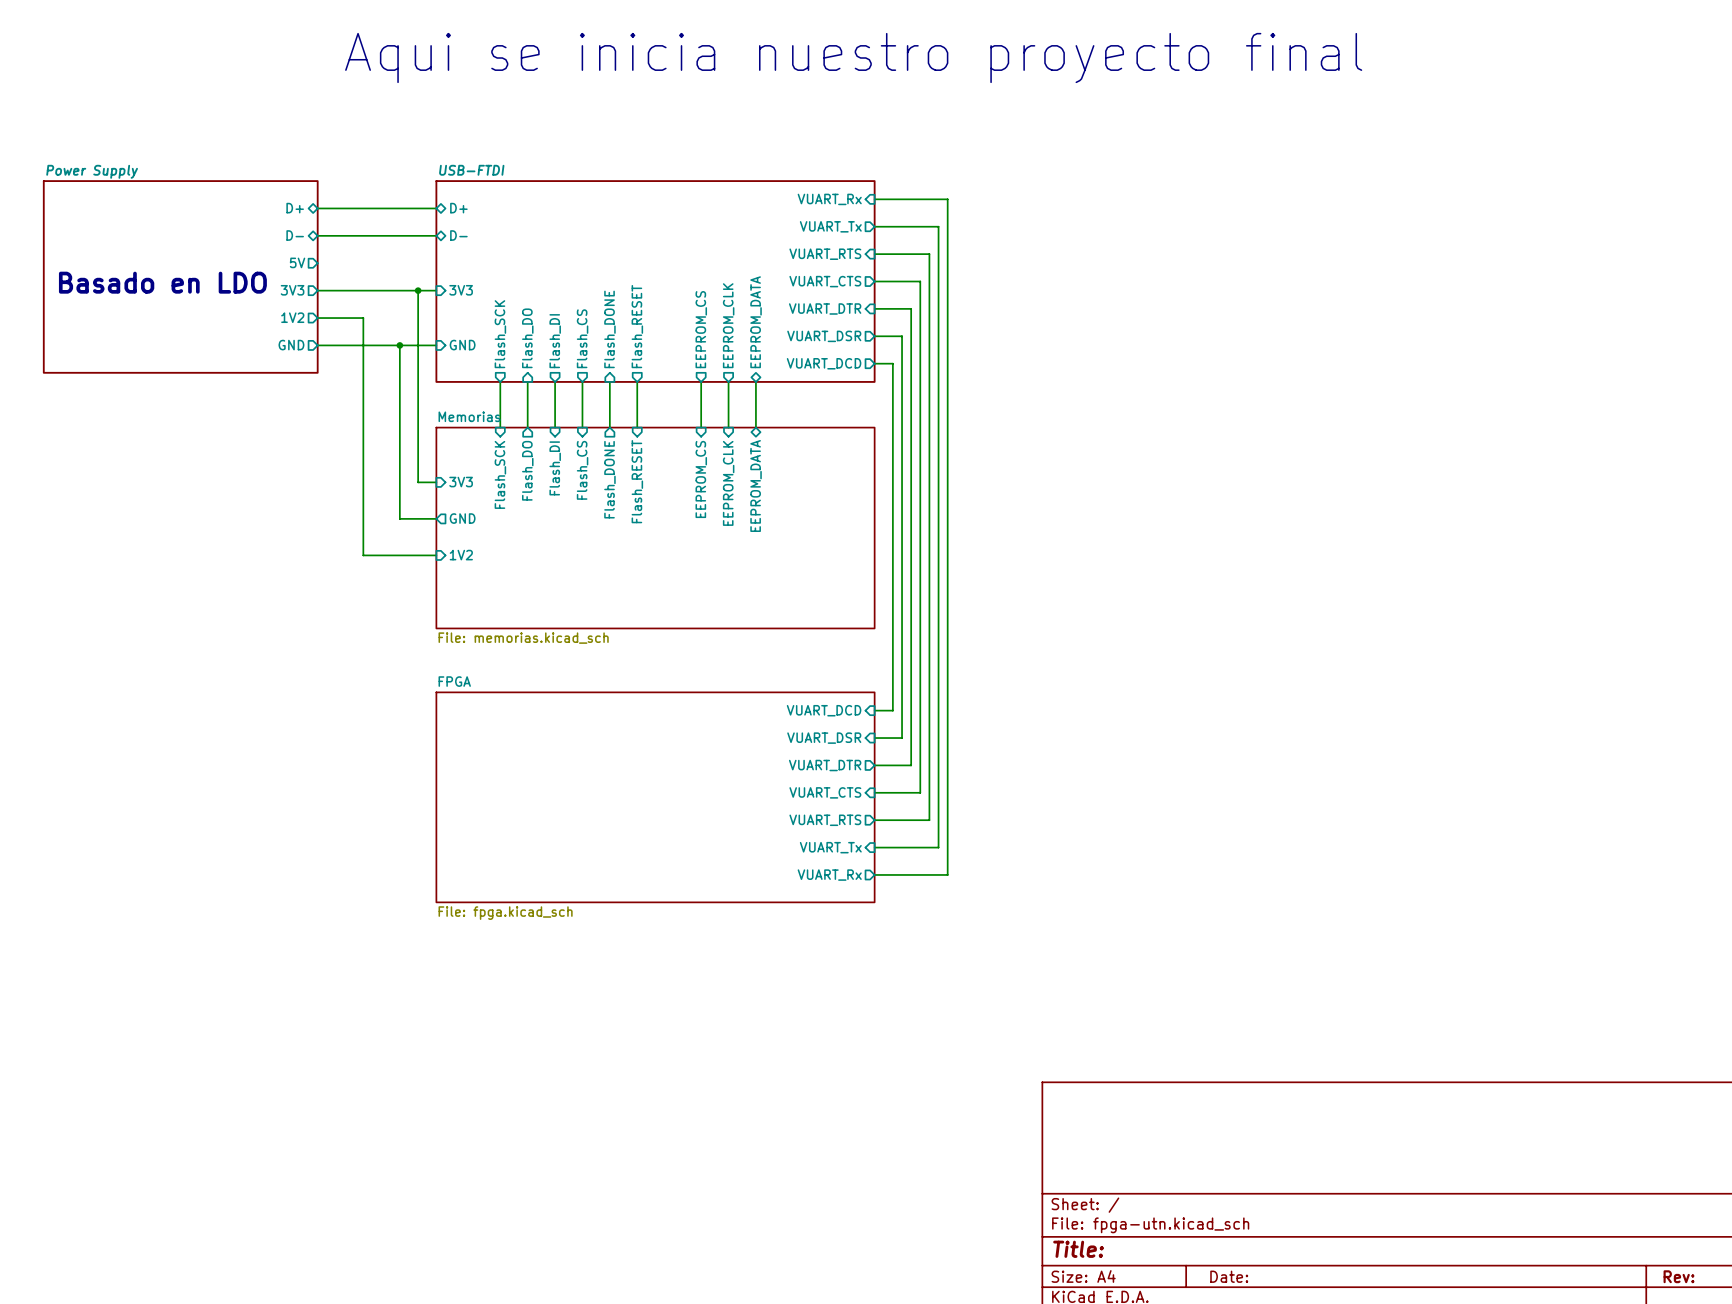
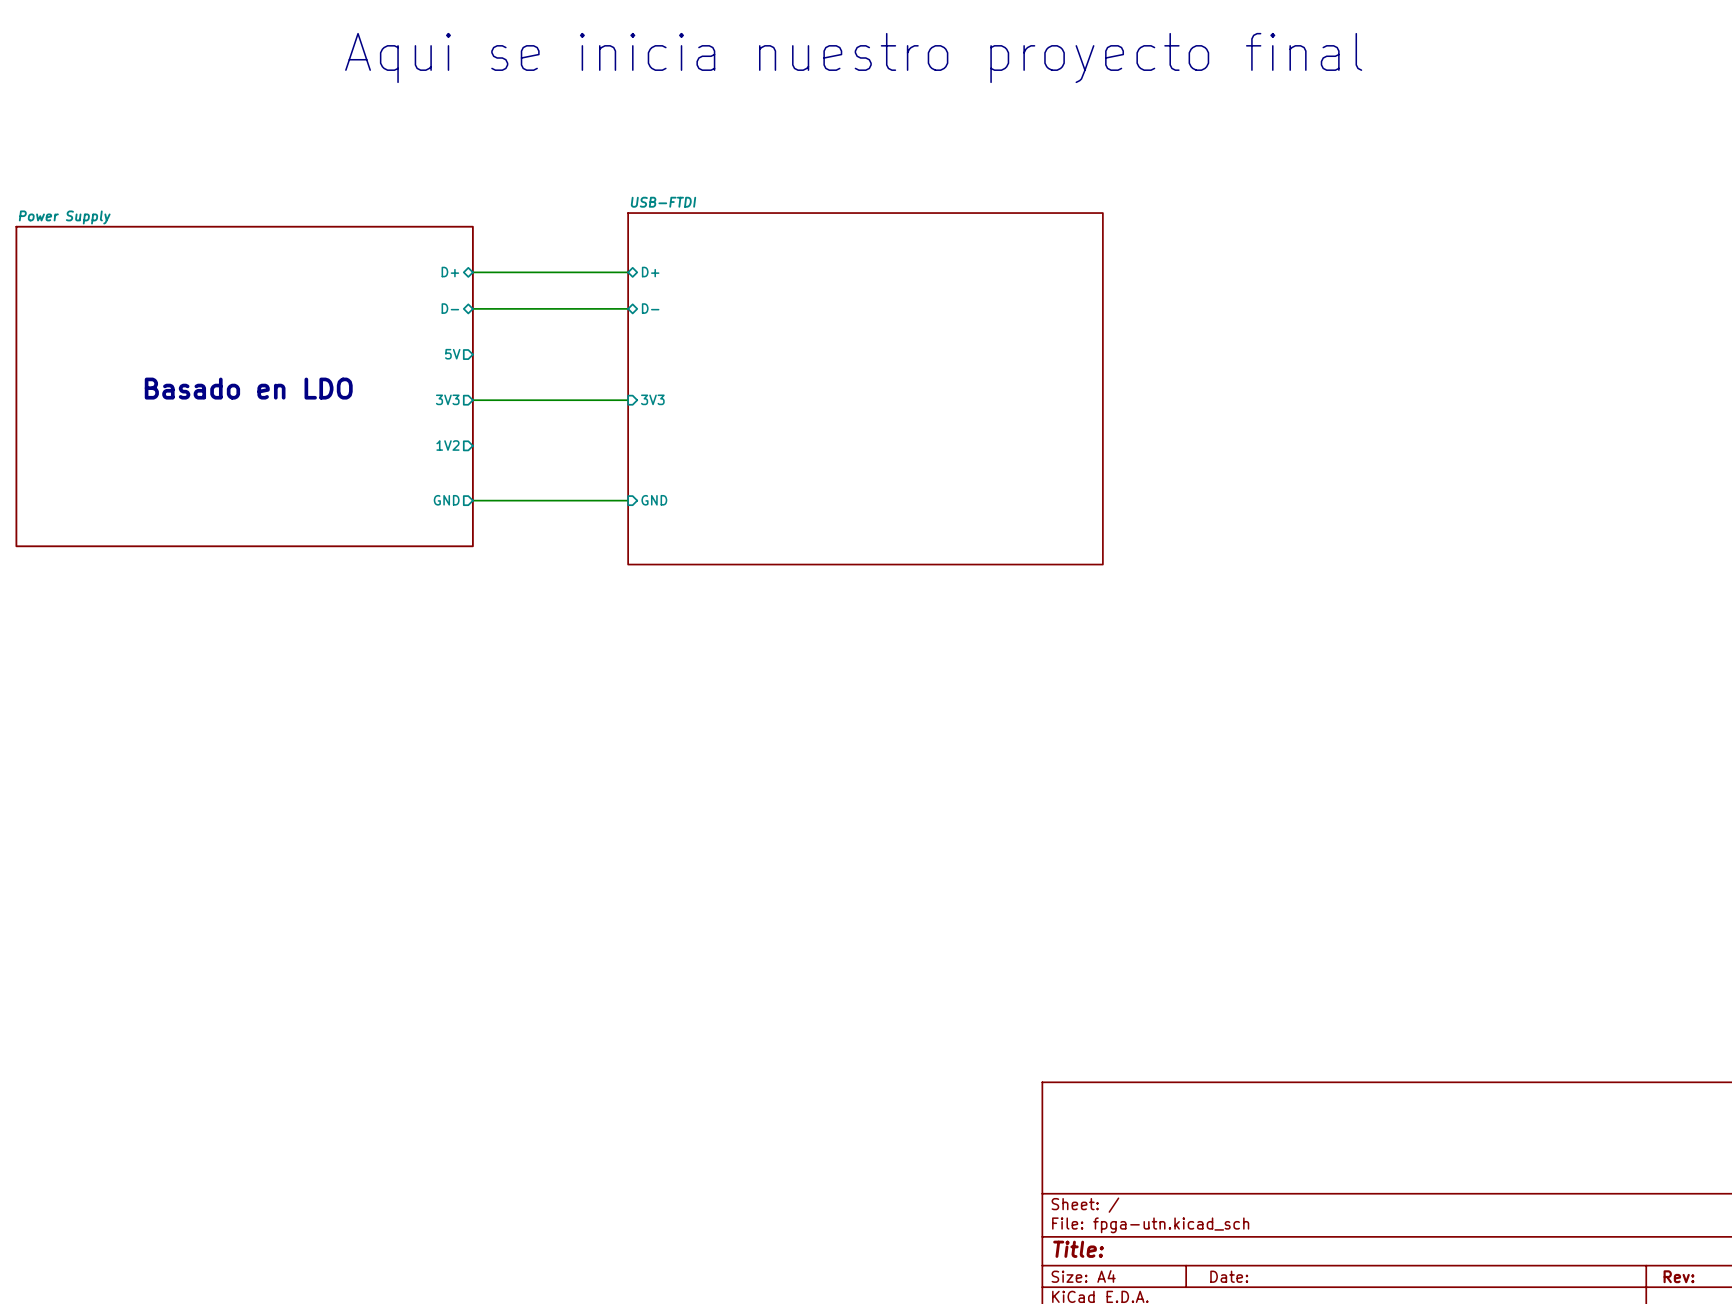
sheet pin: VUART_Rx (829, 199) -> none
wire: (874, 199) (947, 199) (947, 874) (874, 874) -> none
sheet pin: D+ (295, 208) -> none
wire: (317, 208) (436, 208) -> none
sheet pin rotation: 0° (458, 208) -> 180° (450, 272)
sheet pin position: D+ (458, 208) -> D+ (450, 272)
sheet pin: VUART_Tx (830, 226) -> none
wire: (874, 226) (938, 226) (938, 847) (874, 847) -> none
sheet pin: D- (295, 235) -> none
wire: (317, 235) (436, 235) -> none
sheet pin rotation: 0° (458, 235) -> 180° (450, 308)
sheet pin position: D- (458, 235) -> D- (450, 308)
sheet pin: VUART_RTS (825, 254) -> none
wire: (874, 254) (929, 254) (929, 820) (874, 820) -> none
sheet pin: 5V (297, 262) -> none
wire: none -> (472, 272) (628, 272)
sheet pin: none -> D+ (650, 272)
sheet Power Supply: (180, 276) -> none
sheet USB-FTDI: (655, 281) -> none
sheet pin: VUART_CTS (825, 281) -> none
wire: (874, 281) (920, 281) (920, 792) (874, 792) -> none
text position: Basado en LDO (162, 282) -> Basado en LDO (248, 388)
sheet pin: 3V3 (292, 290) -> none
wire: (317, 290) (436, 290) -> none
wire: (418, 290) (418, 482) (436, 482) -> none
junction: (418, 290) -> none
sheet pin: 3V3 (461, 290) -> none
wire: none -> (472, 308) (628, 308)
sheet pin: none -> D- (650, 308)
sheet pin: VUART_DTR (825, 308) -> none
wire: (874, 308) (911, 308) (911, 765) (874, 765) -> none
sheet pin: 1V2 (292, 317) -> none
wire: (317, 318) (363, 318) (363, 555) (436, 555) -> none
sheet pin: EEPROM_DATA (756, 322) -> none
sheet pin: EEPROM_CLK (728, 325) -> none
sheet pin: Flash_RESET (637, 326) -> none
sheet pin: Flash_DONE (609, 329) -> none
sheet pin: EEPROM_CS (701, 329) -> none
sheet pin: Flash_SCK (500, 334) -> none
sheet pin: VUART_DSR (824, 336) -> none
wire: (874, 336) (902, 336) (902, 738) (874, 738) -> none
sheet pin: Flash_DO (527, 338) -> none
sheet pin: Flash_CS (582, 338) -> none
sheet pin: Flash_DI (555, 341) -> none
sheet pin: GND (291, 345) -> none
wire: (317, 345) (436, 345) -> none
wire: (399, 345) (399, 518) (436, 518) -> none
junction: (399, 345) -> none
sheet pin: GND (462, 345) -> none
sheet pin: none -> 5V (452, 354)
sheet pin: VUART_DCD (824, 363) -> none
wire: (874, 363) (892, 363) (892, 710) (874, 710) -> none
wire: (500, 381) (500, 427) -> none
wire: (527, 381) (527, 427) -> none
wire: (555, 381) (555, 427) -> none
wire: (582, 381) (582, 427) -> none
wire: (609, 381) (609, 427) -> none
wire: (637, 381) (637, 427) -> none
wire: (701, 381) (701, 427) -> none
wire: (728, 381) (728, 427) -> none
wire: (755, 381) (755, 427) -> none
sheet Power Supply: none -> (244, 386)
sheet USB-FTDI: none -> (865, 388)
sheet pin: none -> 3V3 (447, 399)
sheet pin: none -> 3V3 (652, 399)
wire: none -> (472, 400) (628, 400)
sheet pin: none -> 1V2 (447, 445)
sheet pin: Flash_DI (555, 468) -> none
sheet pin: Flash_DO (527, 470) -> none
sheet pin: Flash_CS (582, 470) -> none
sheet pin: Flash_SCK (500, 474) -> none
sheet pin: Flash_DONE (609, 479) -> none
sheet pin: EEPROM_CS (701, 479) -> none
sheet pin: Flash_RESET (637, 481) -> none
sheet pin: 3V3 (461, 482) -> none
sheet pin: EEPROM_CLK (728, 483) -> none
sheet pin: EEPROM_DATA (756, 485) -> none
wire: none -> (472, 500) (628, 500)
sheet pin: none -> GND (654, 500)
sheet pin rotation: 0° (462, 518) -> 180° (446, 500)
sheet Memorias: File: memorias.kicad_sch (655, 528) -> none
sheet pin: 1V2 (461, 555) -> none
sheet pin: VUART_DCD (824, 710) -> none
sheet pin: VUART_DSR (824, 738) -> none
sheet pin: VUART_DTR (825, 765) -> none
sheet pin: VUART_CTS (825, 792) -> none
sheet FPGA: File: fpga.kicad_sch (655, 797) -> none
sheet pin: VUART_RTS (825, 820) -> none
sheet pin: VUART_Tx (830, 847) -> none
sheet pin: VUART_Rx (829, 875) -> none

